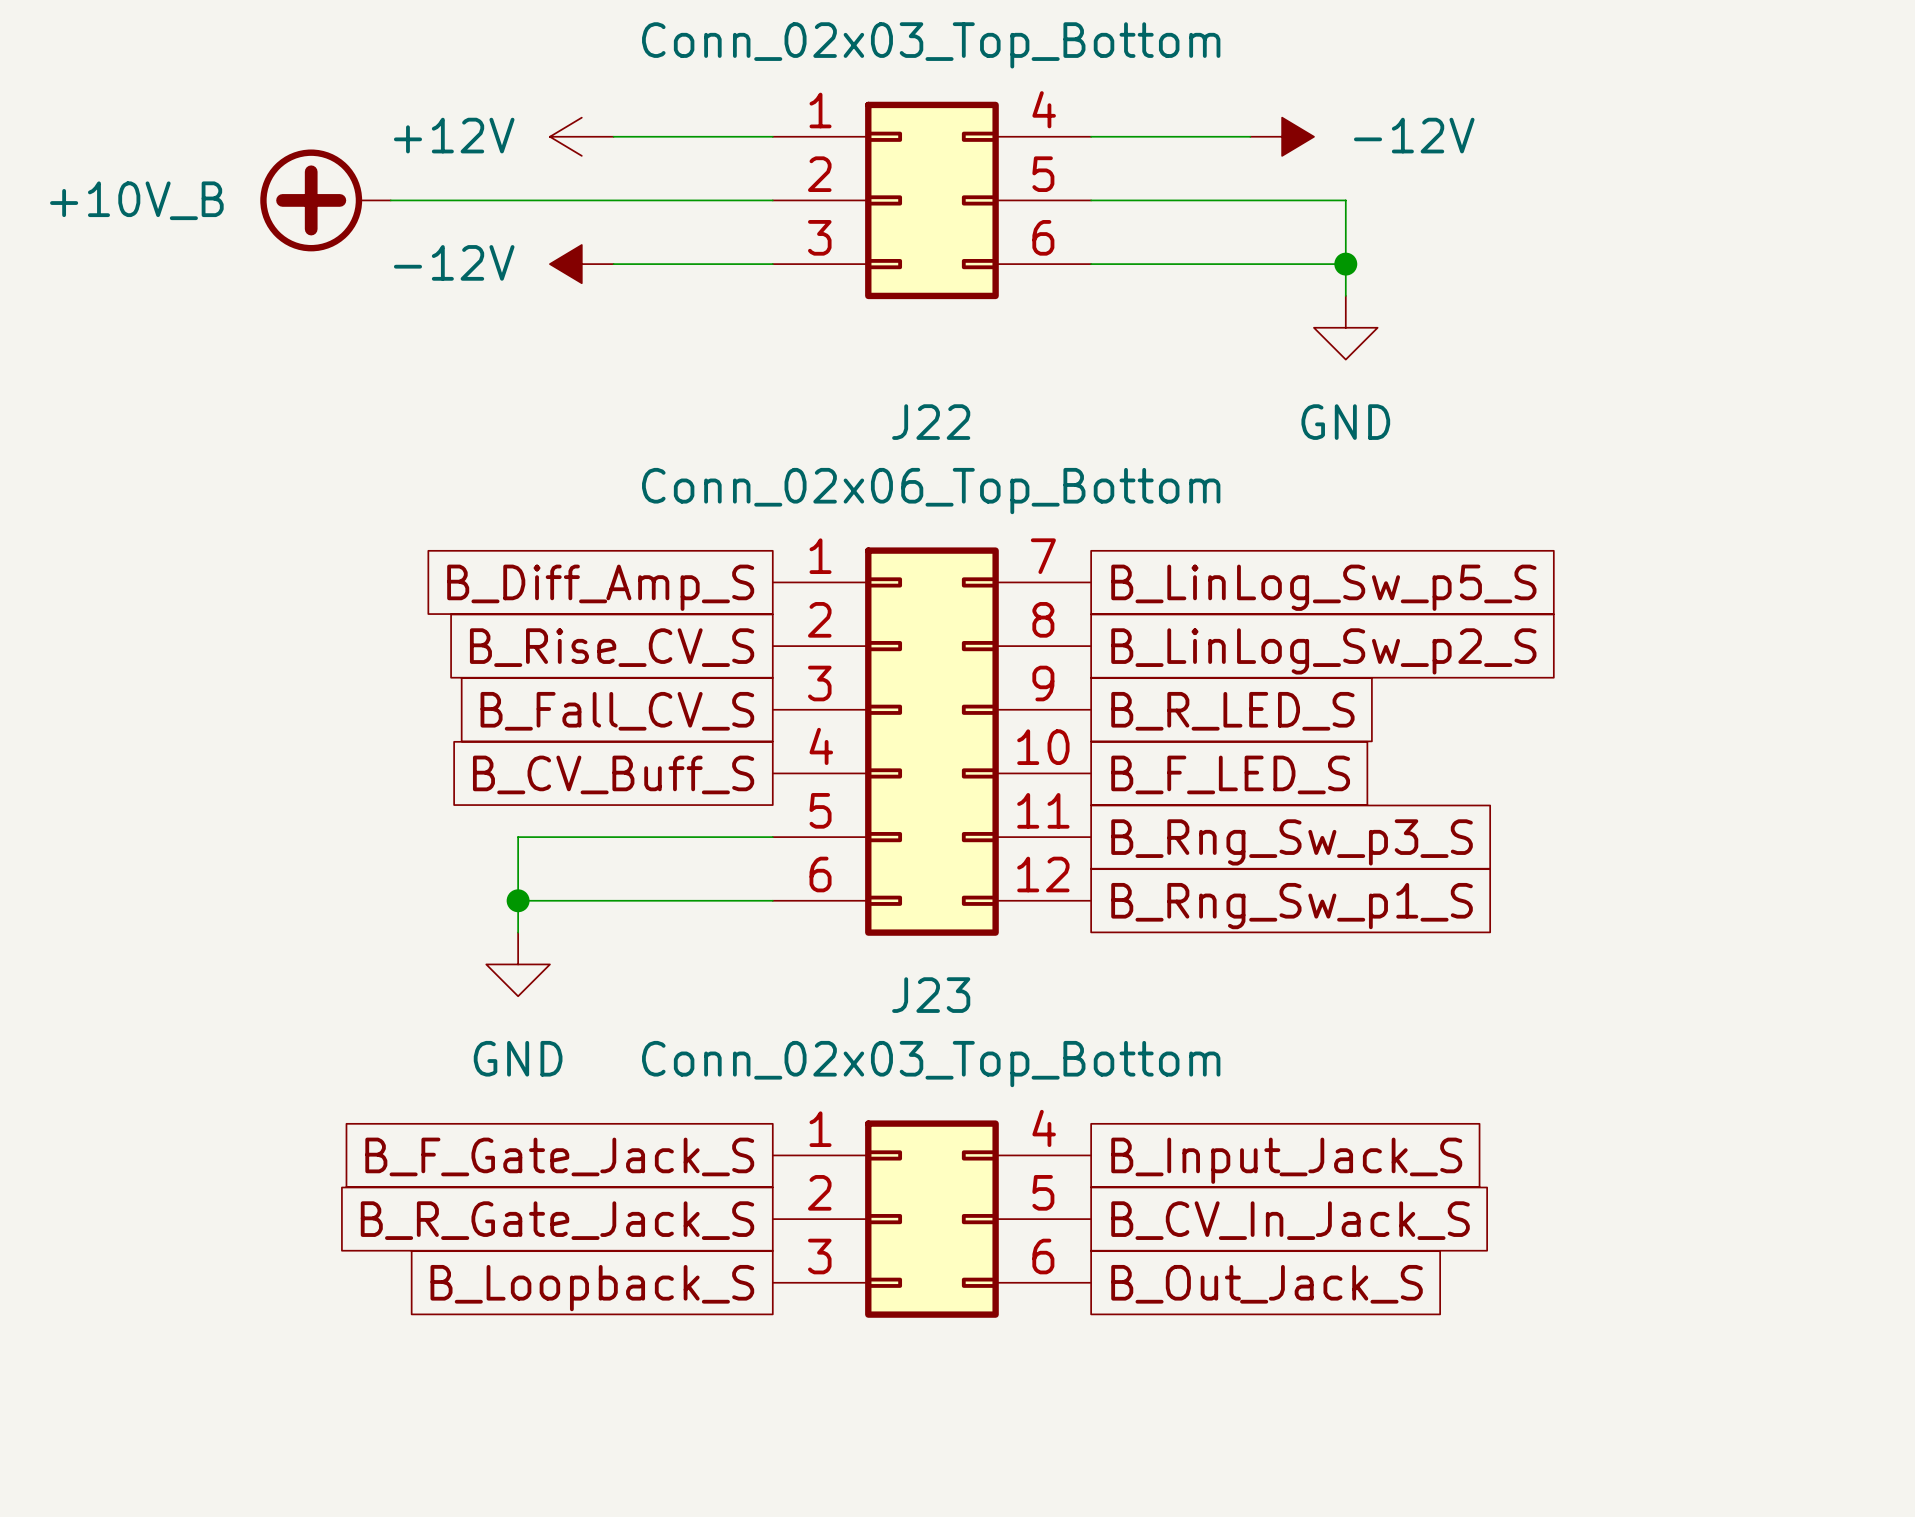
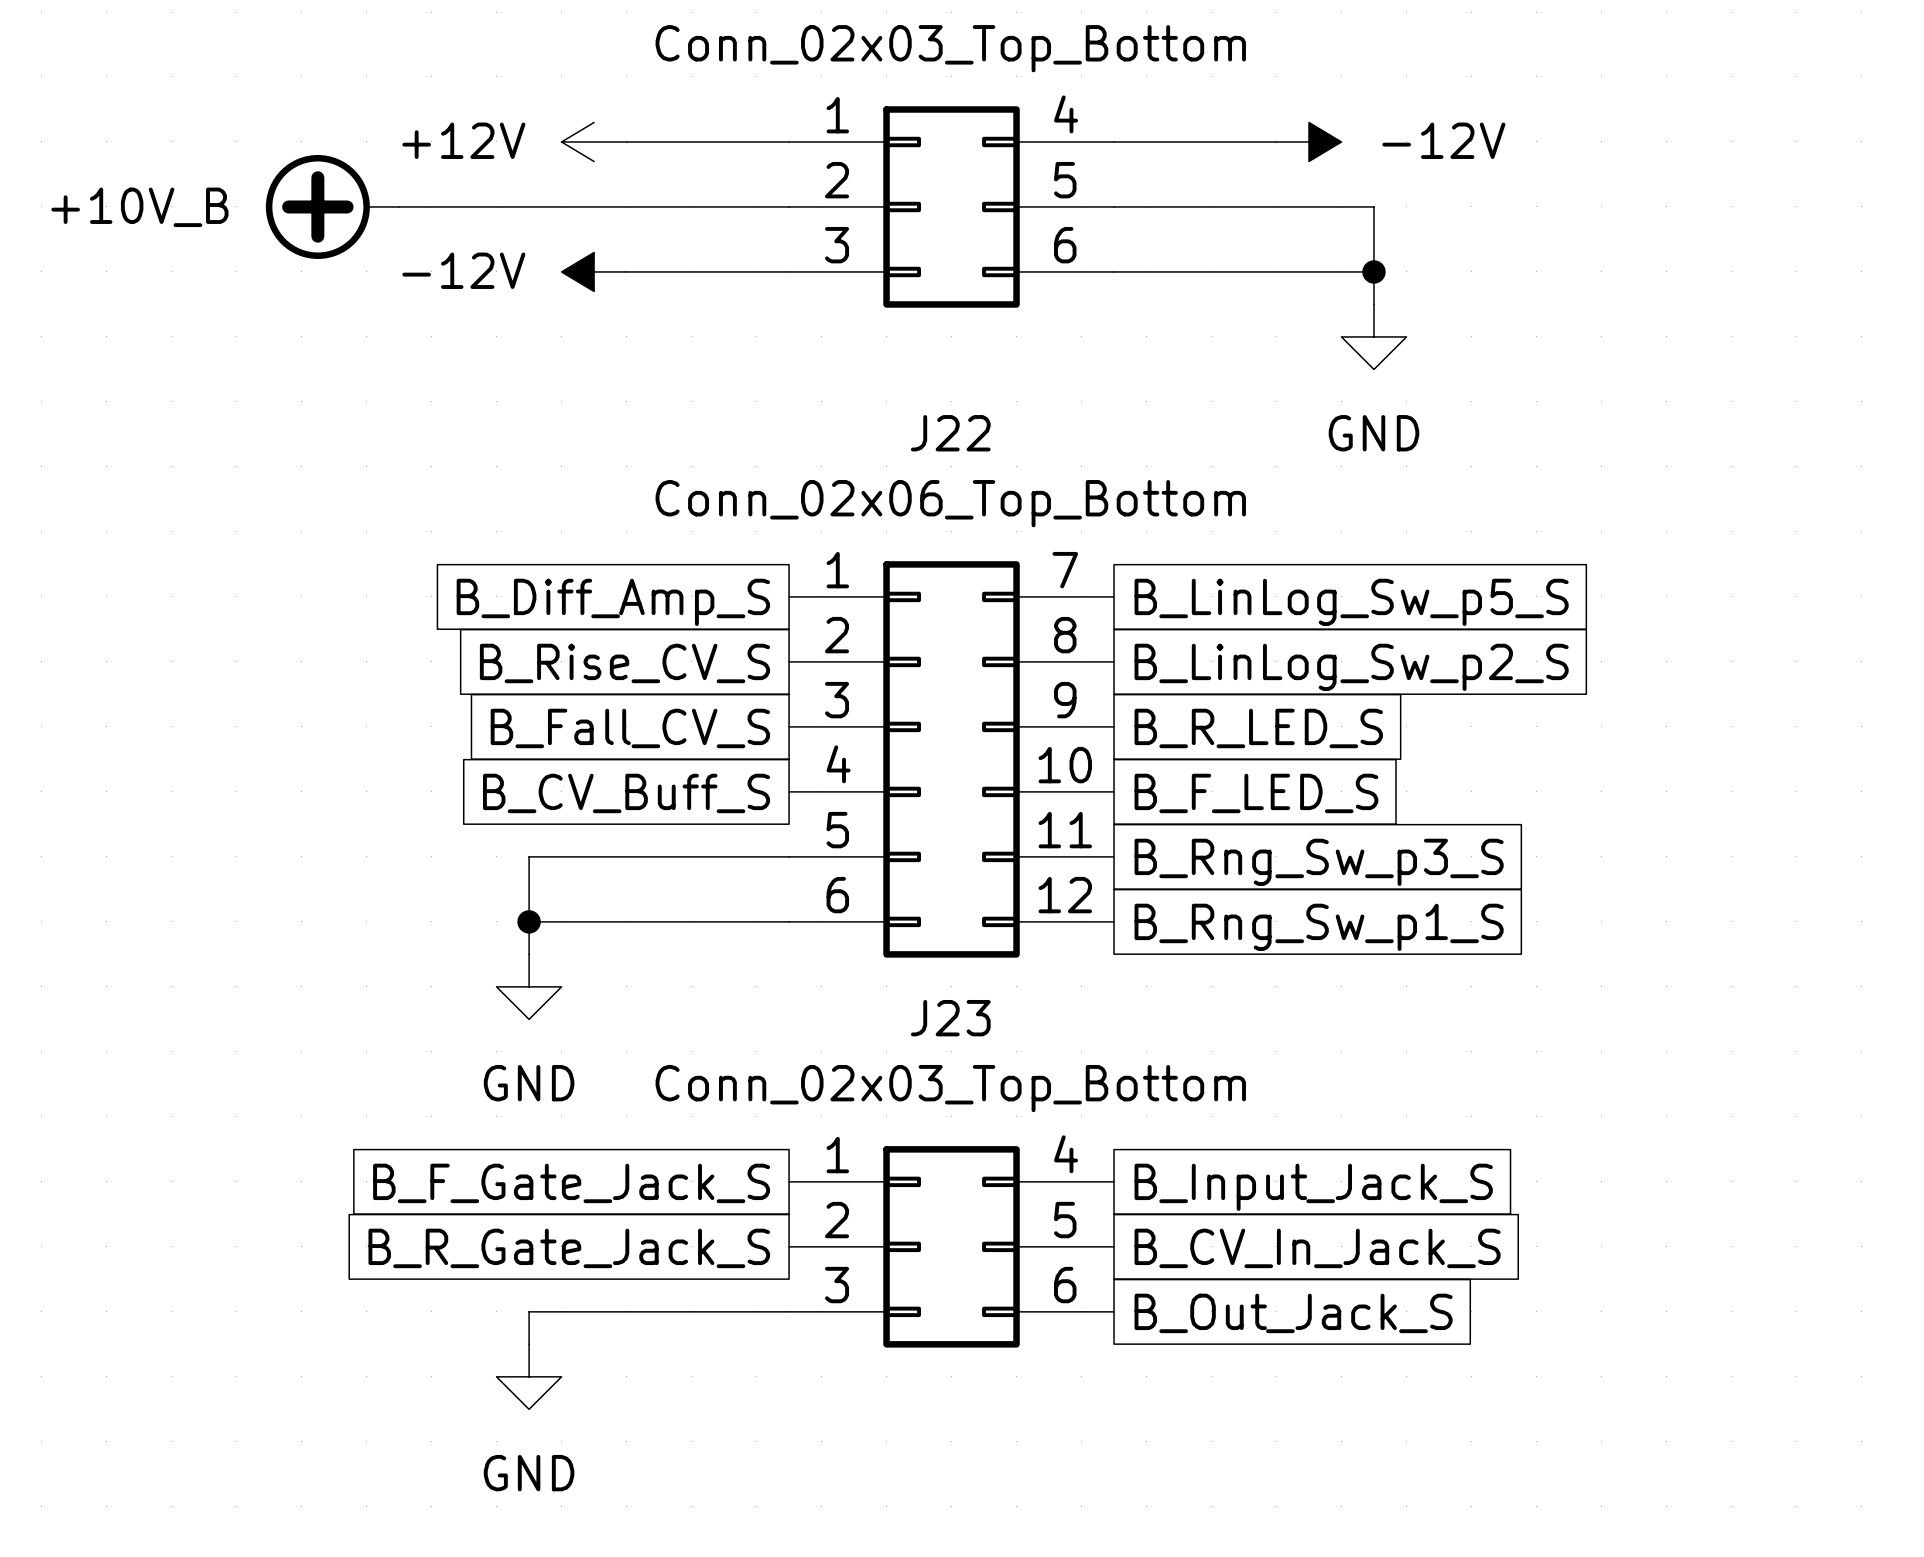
wire: none -> (789, 1311) (529, 1311) (529, 1344)
global label: B_Loopback_S (592, 1288) -> none
power symbol: none -> GND (529, 1376)

